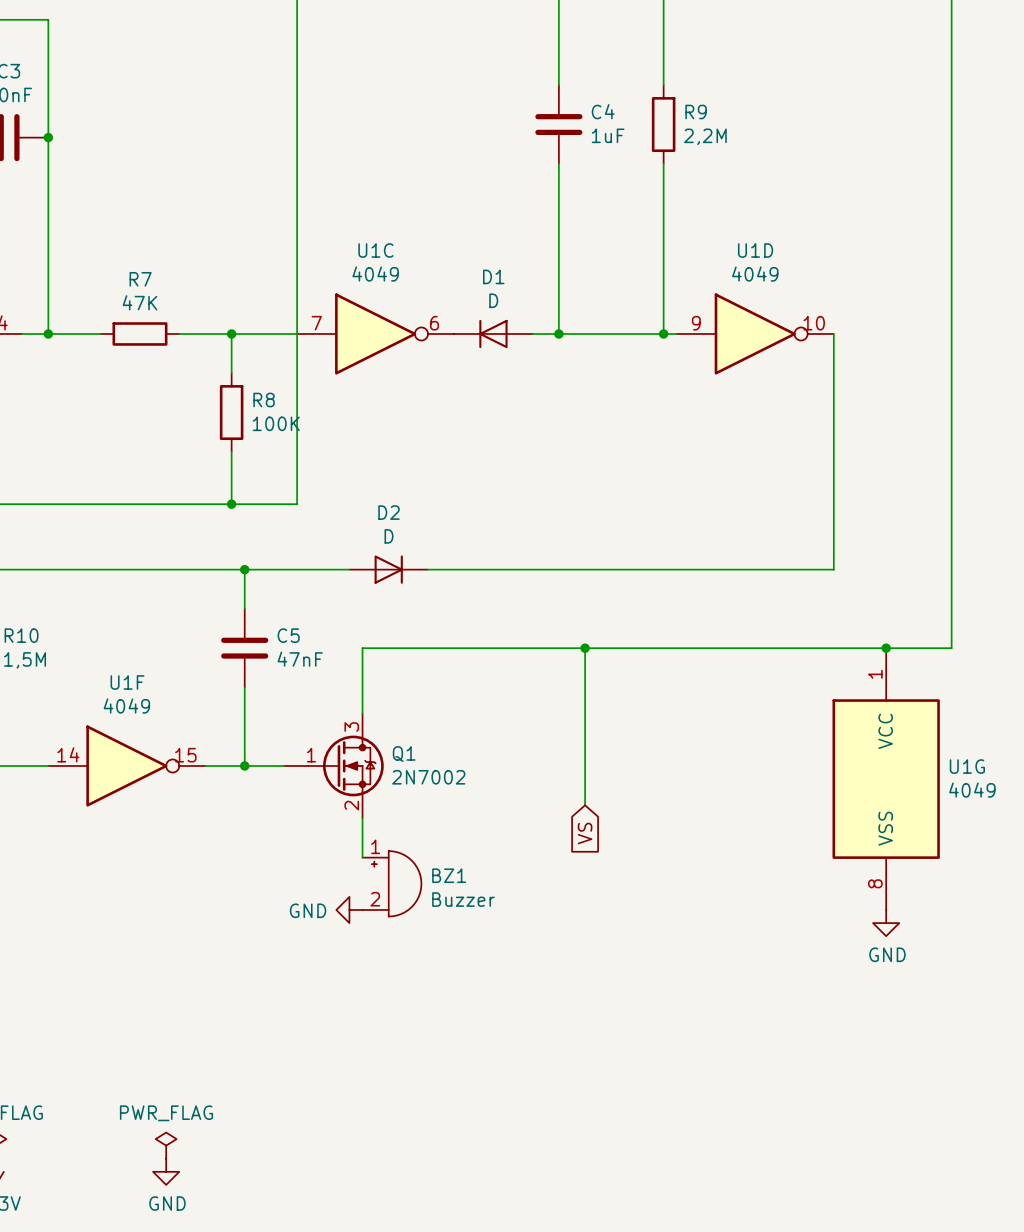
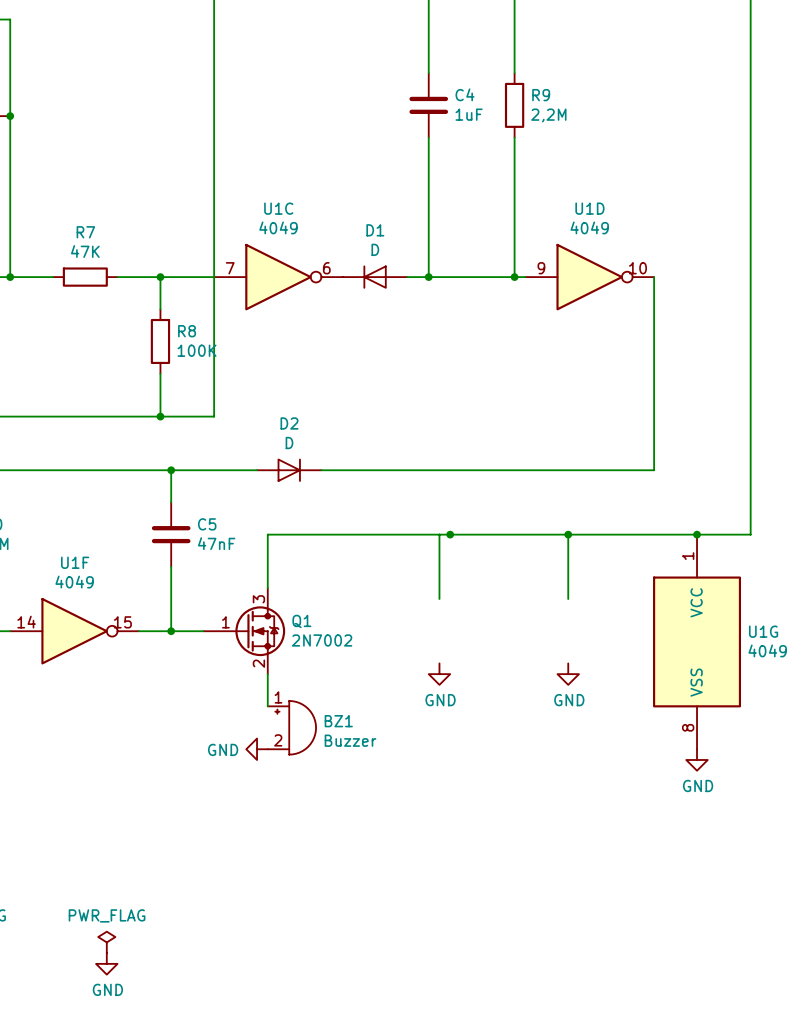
wire: none -> (439, 534) (439, 599)
wire: (585, 648) (585, 805) -> none
wire: none -> (568, 534) (568, 599)
junction: none -> (568, 534)
power symbol: none -> GND (439, 674)
power symbol: none -> GND (568, 674)
global label: VS (585, 833) -> none

